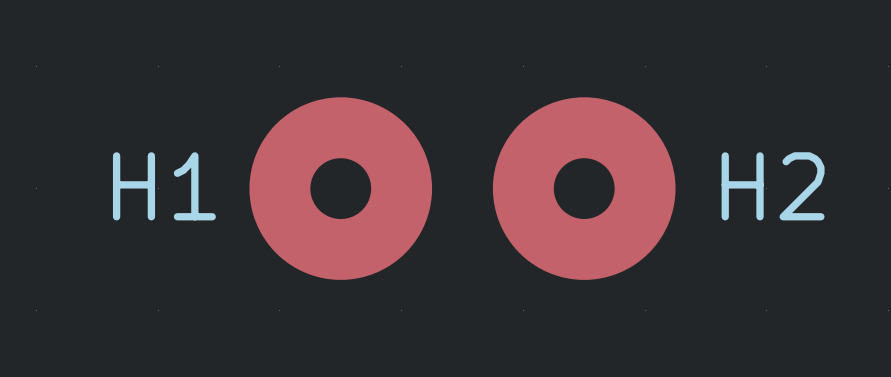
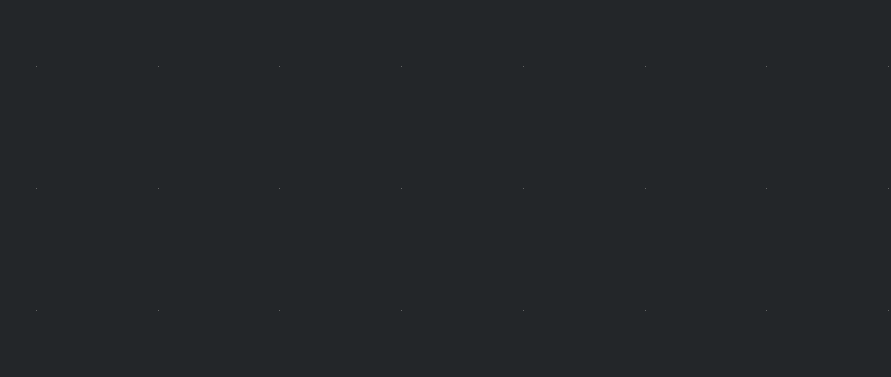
H1: (340, 188) -> none
H2: (584, 188) -> none

